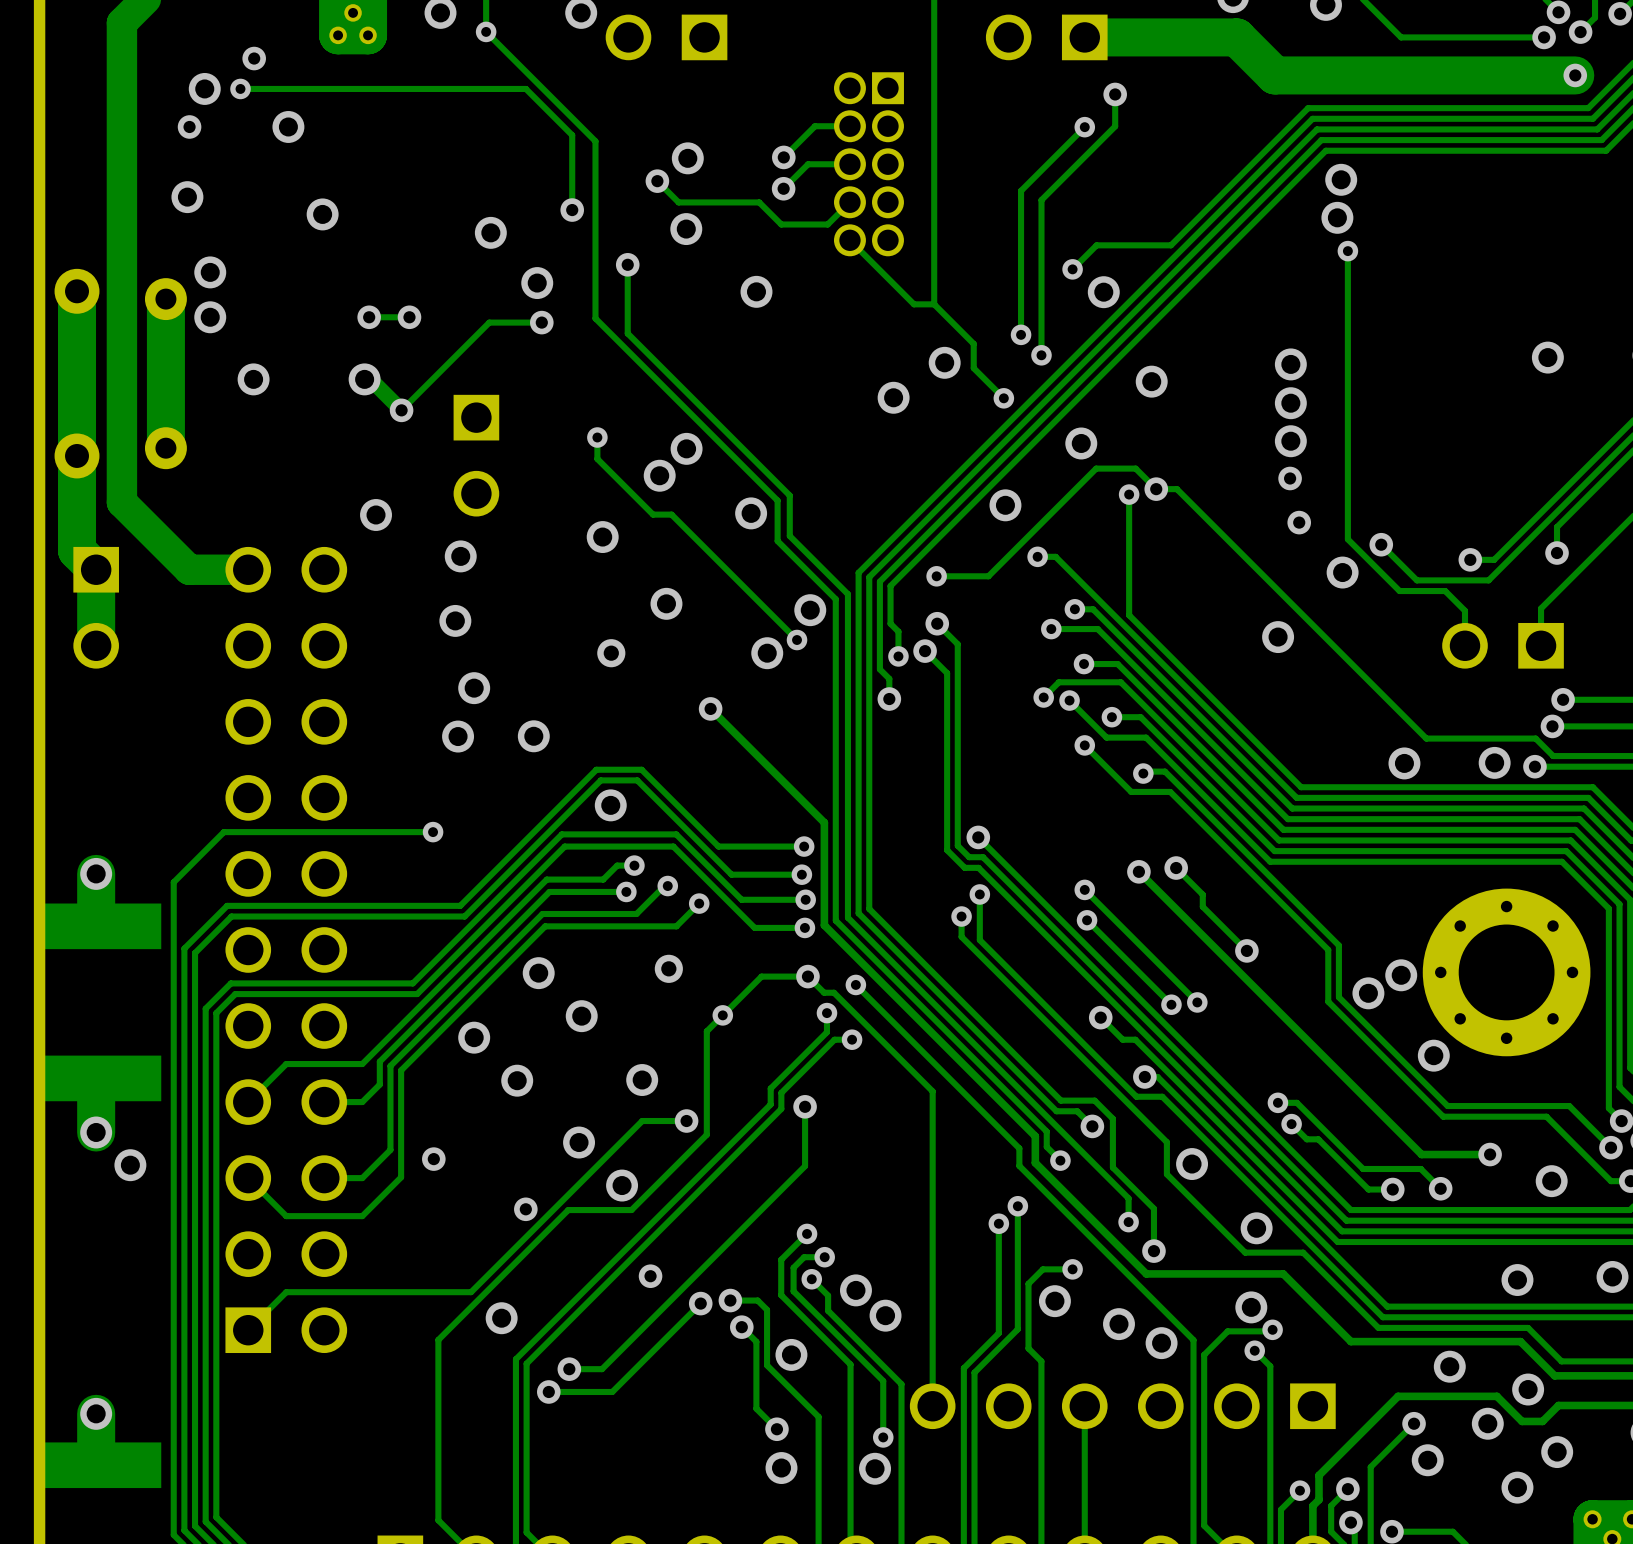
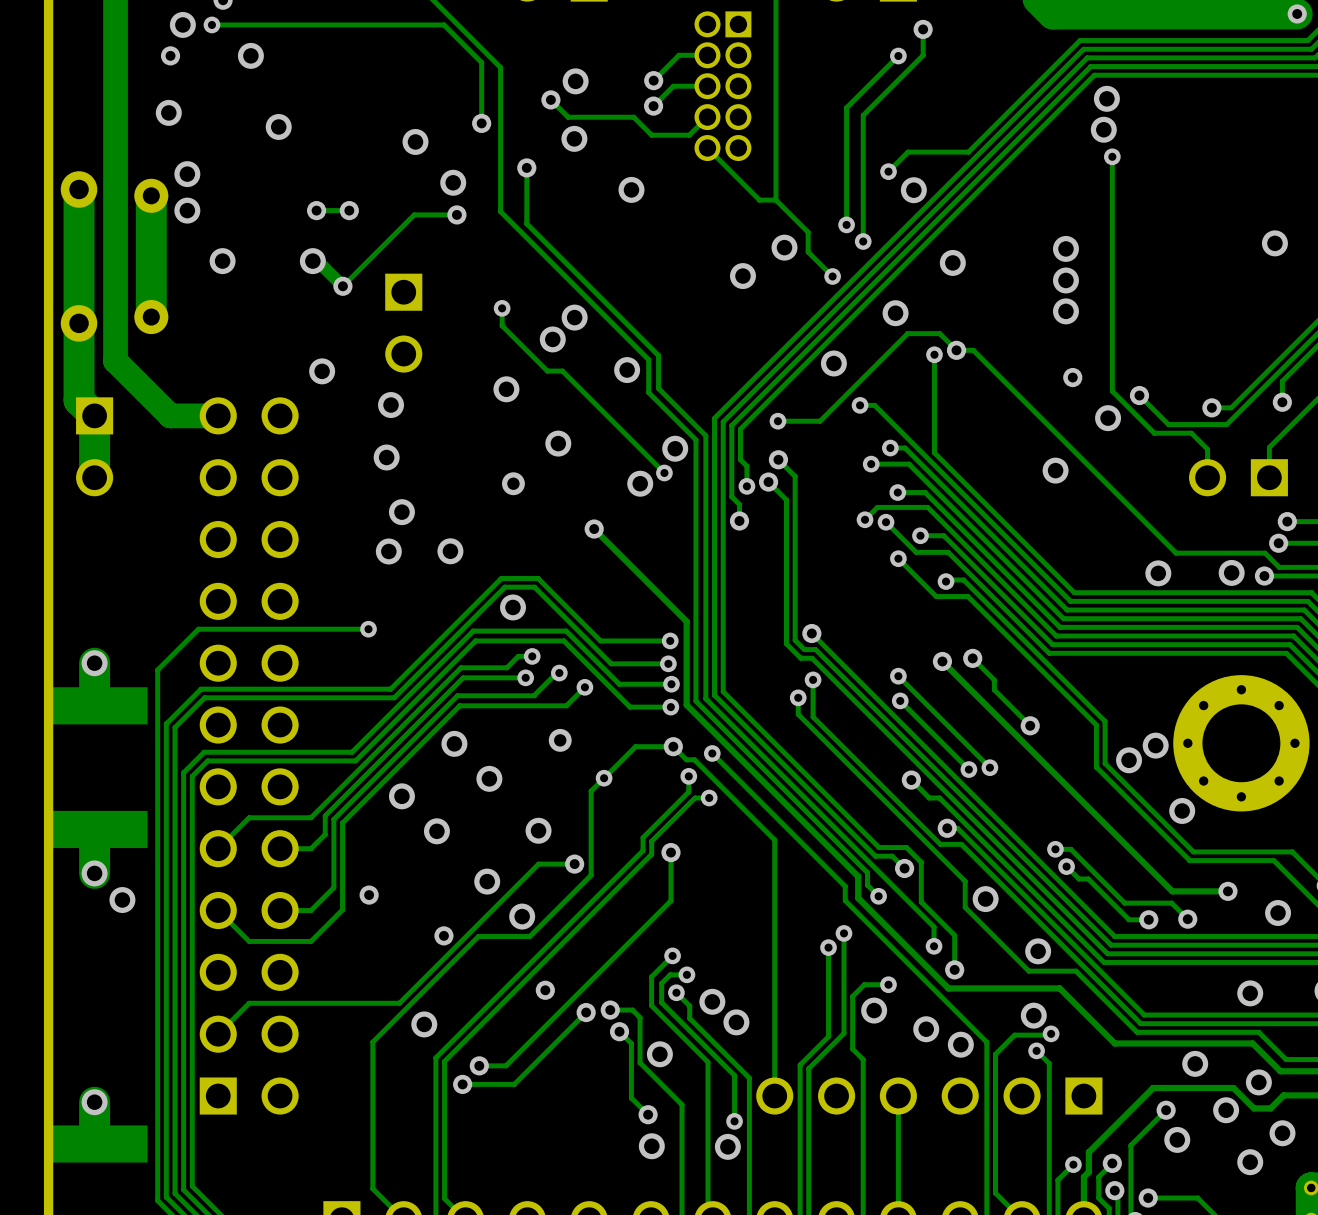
via: (1290, 478) -> none
part: (286, 949) -> none
part: none -> (249, 755)

